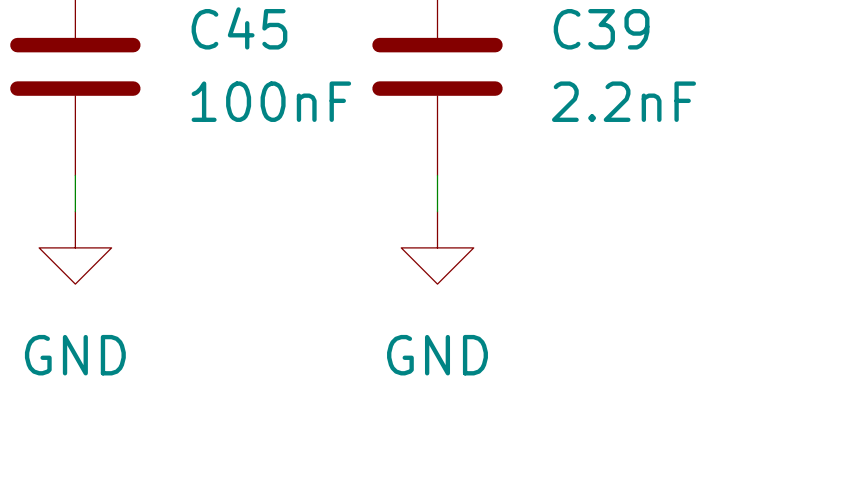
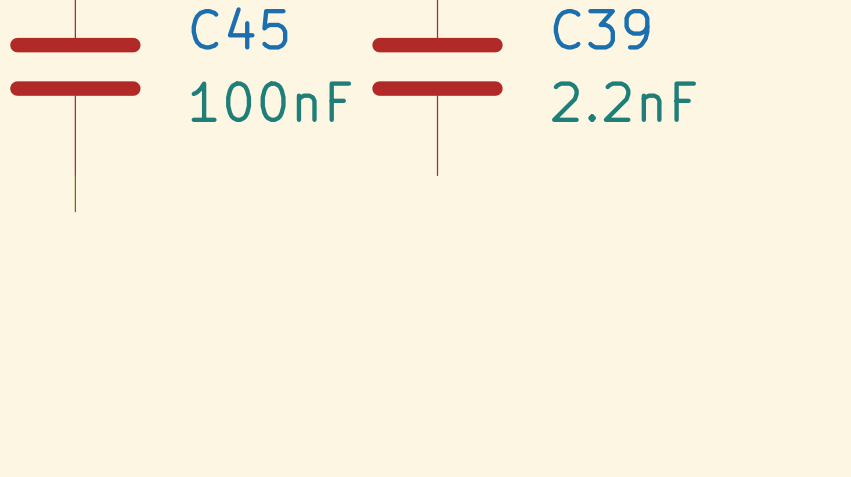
wire: (437, 175) (437, 211) -> none
power symbol: GND (75, 247) -> none
power symbol: GND (437, 247) -> none

